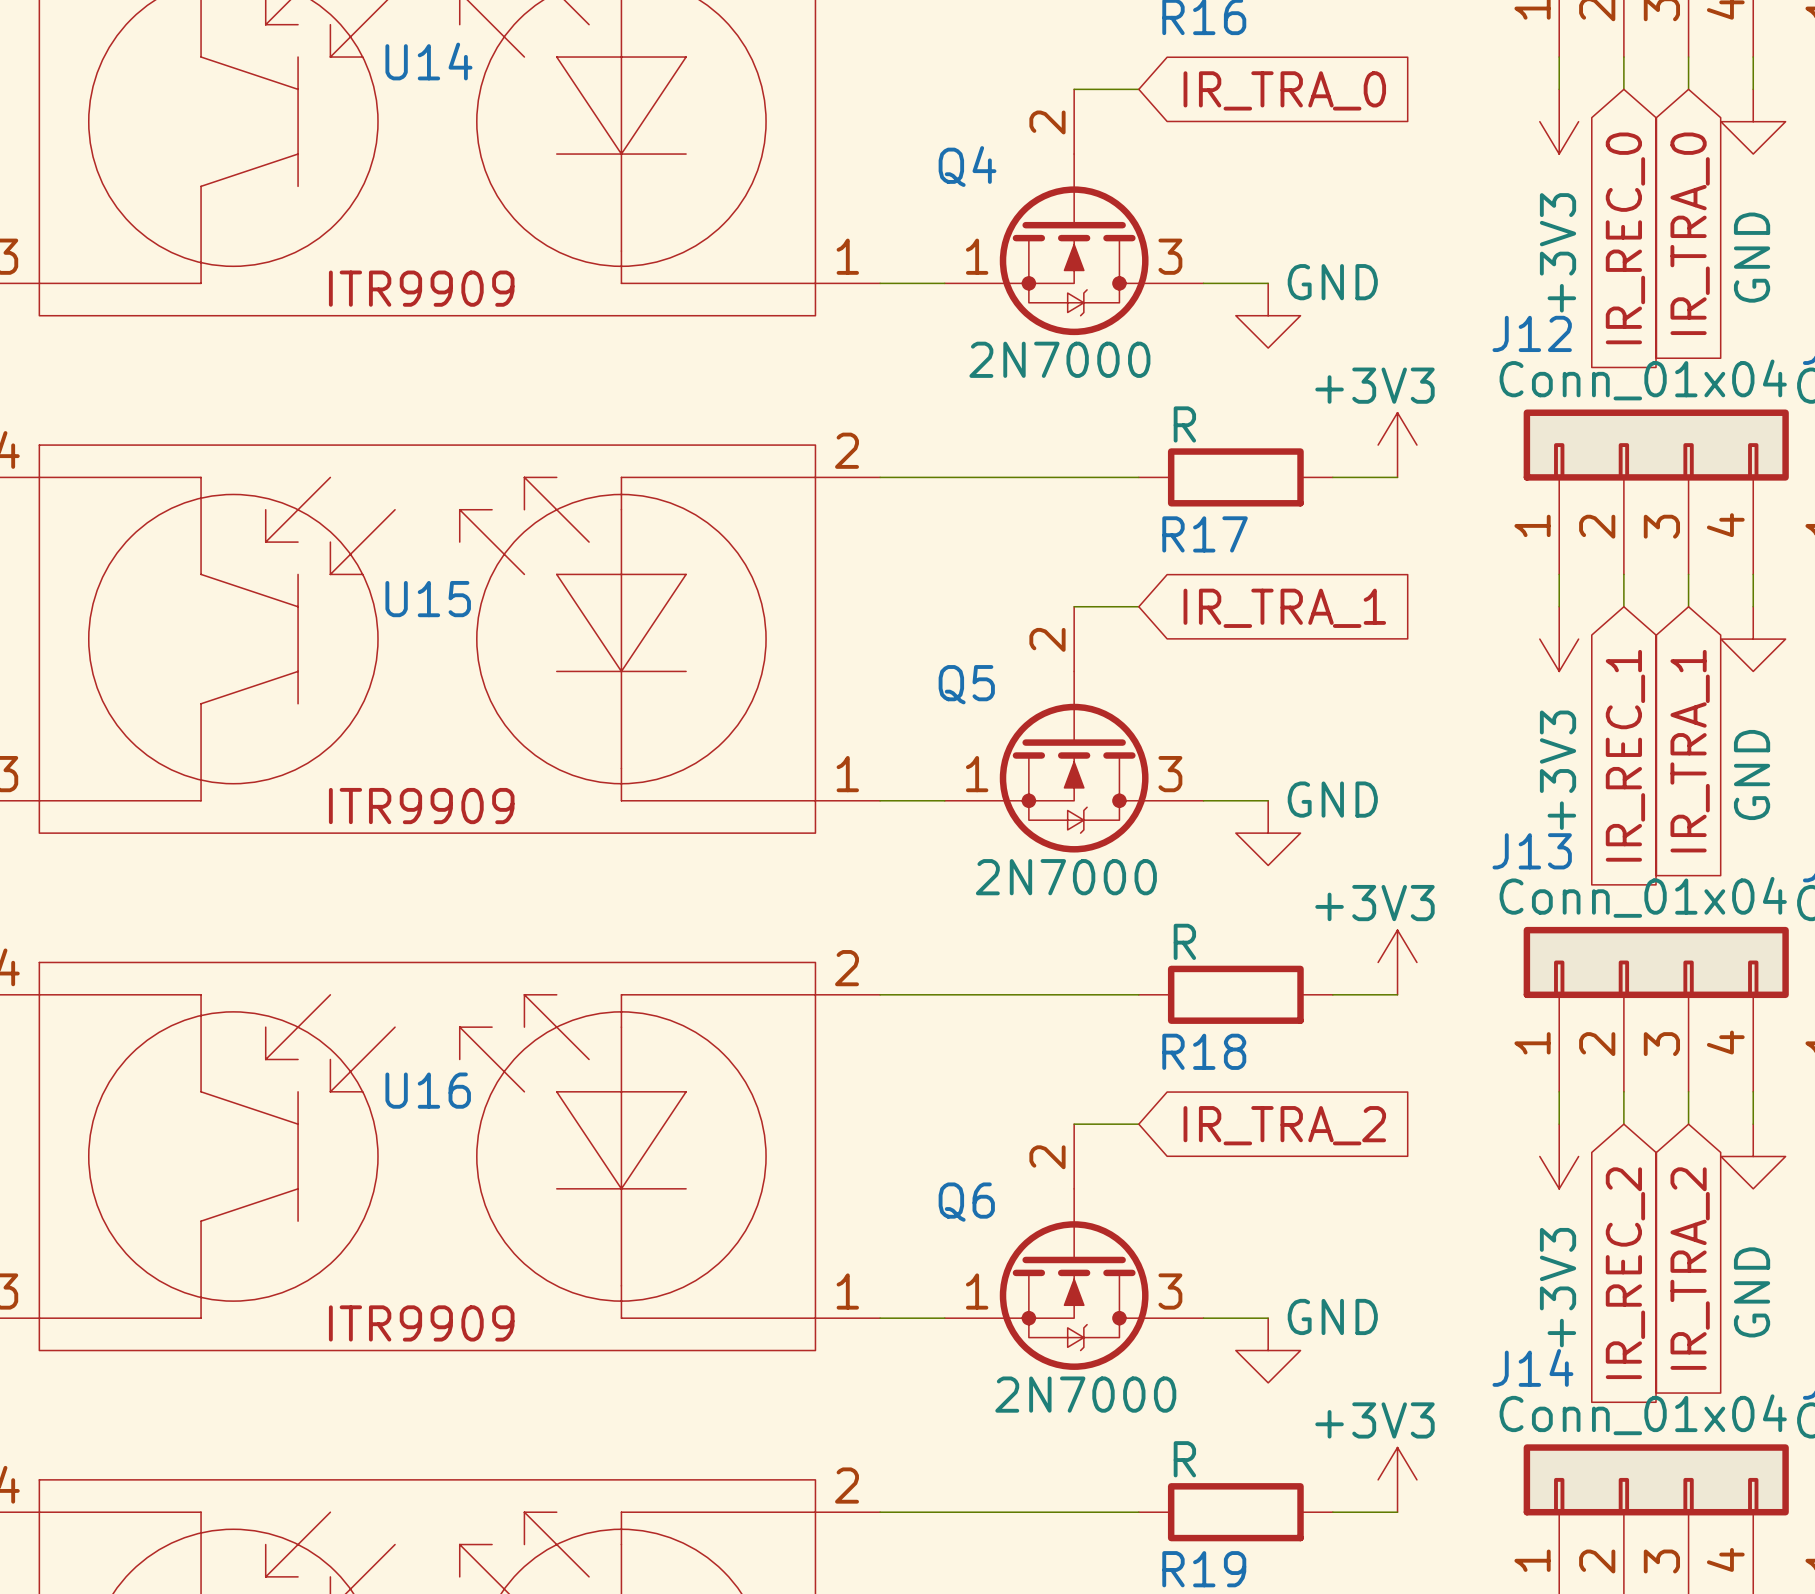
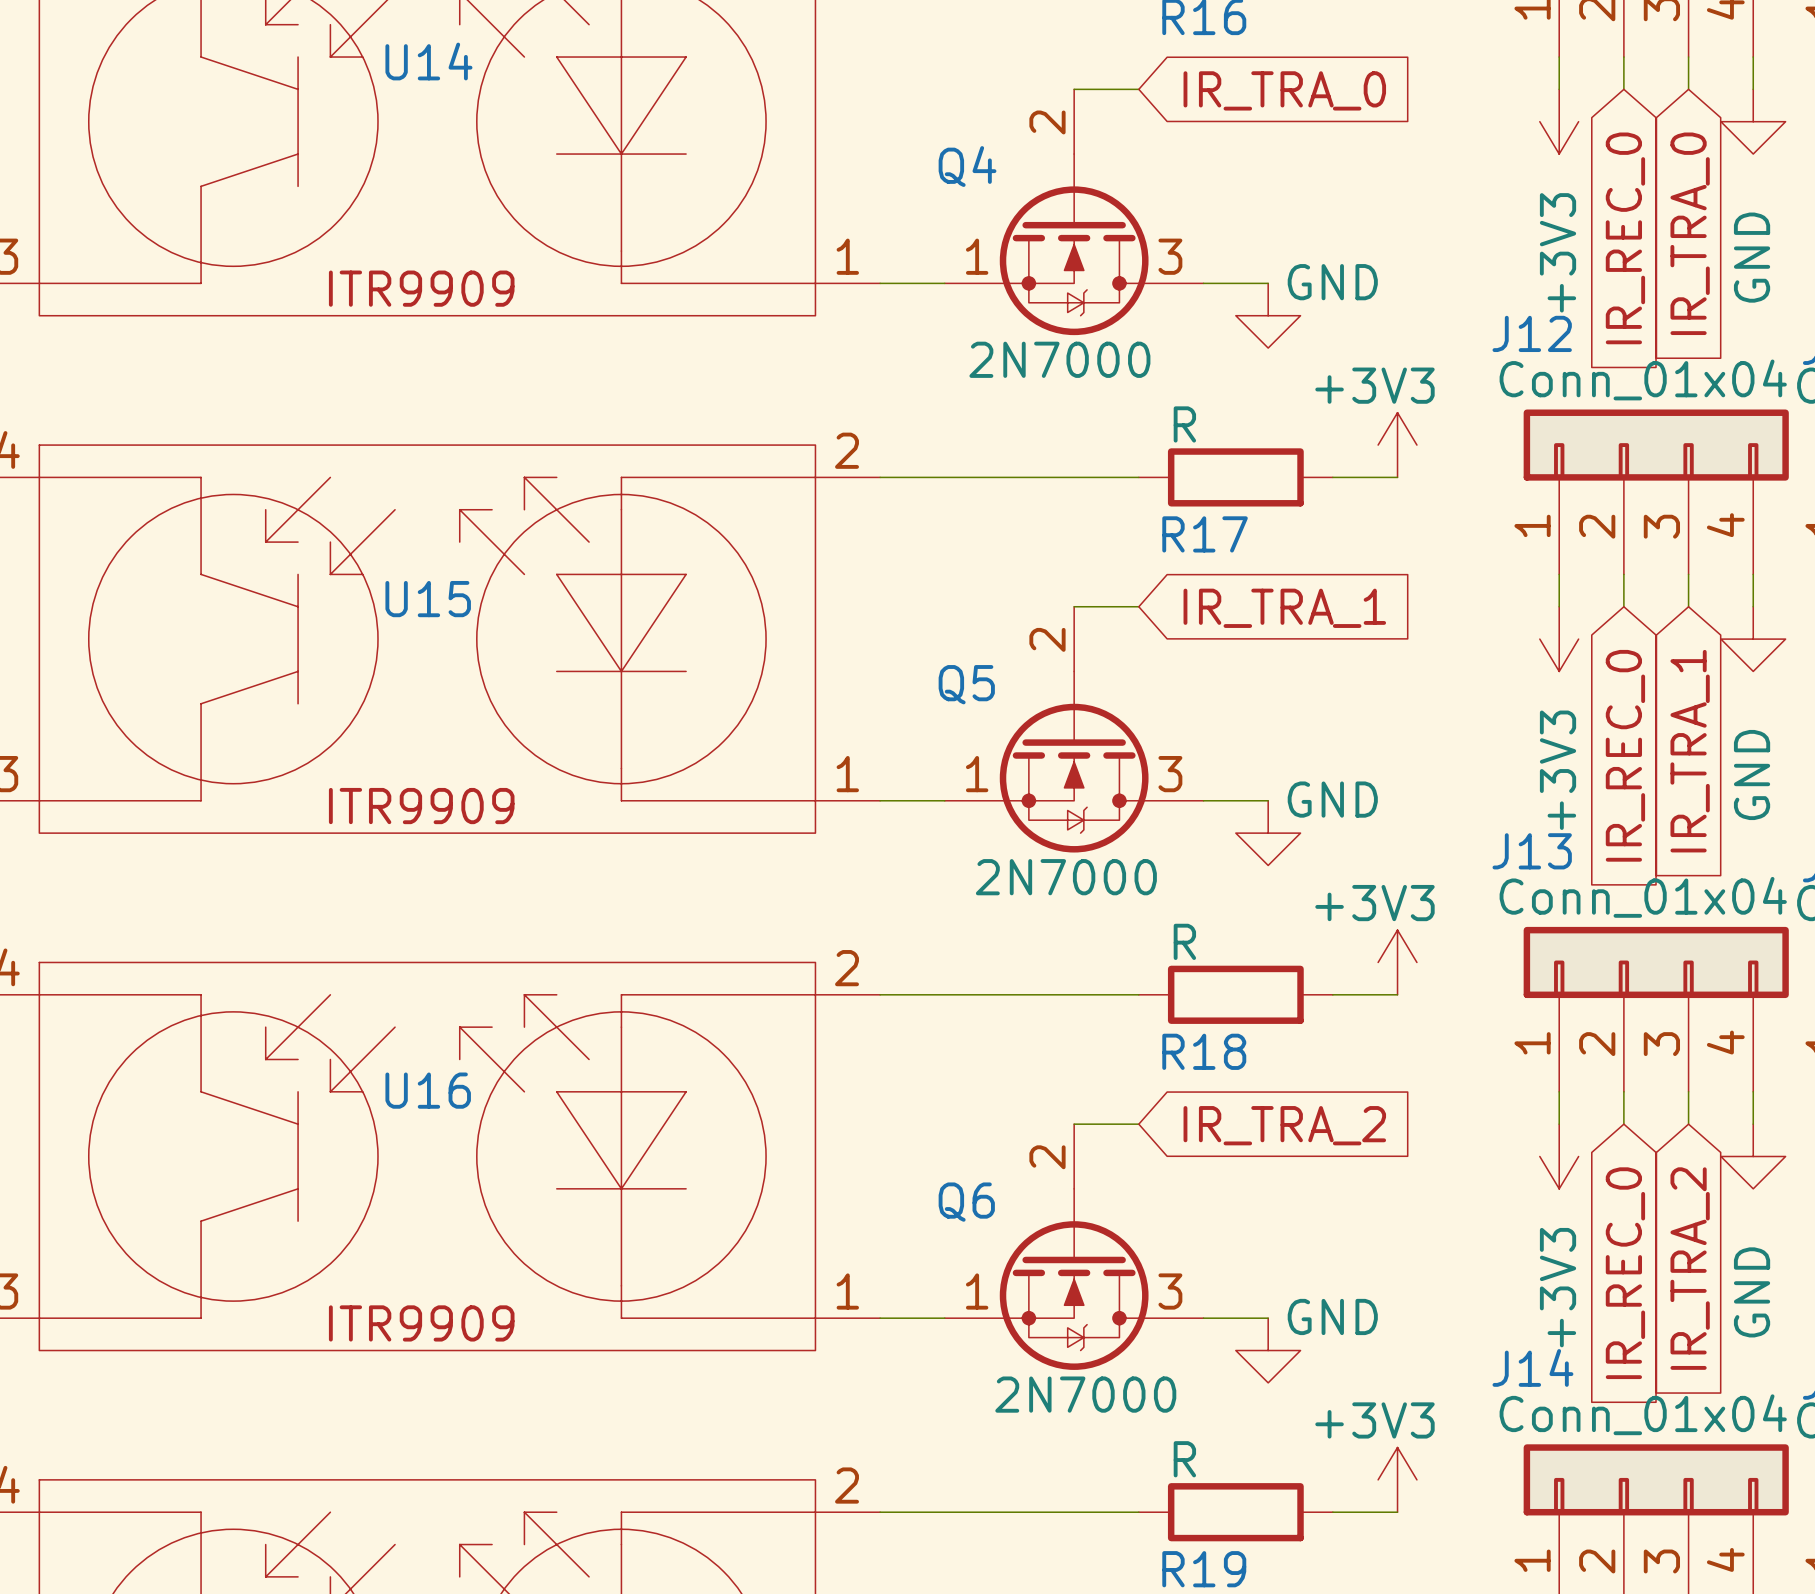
global label: IR_REC_1 (1625, 755) -> IR_REC_0 (1625, 755)
global label: IR_REC_2 (1625, 1273) -> IR_REC_0 (1625, 1273)

